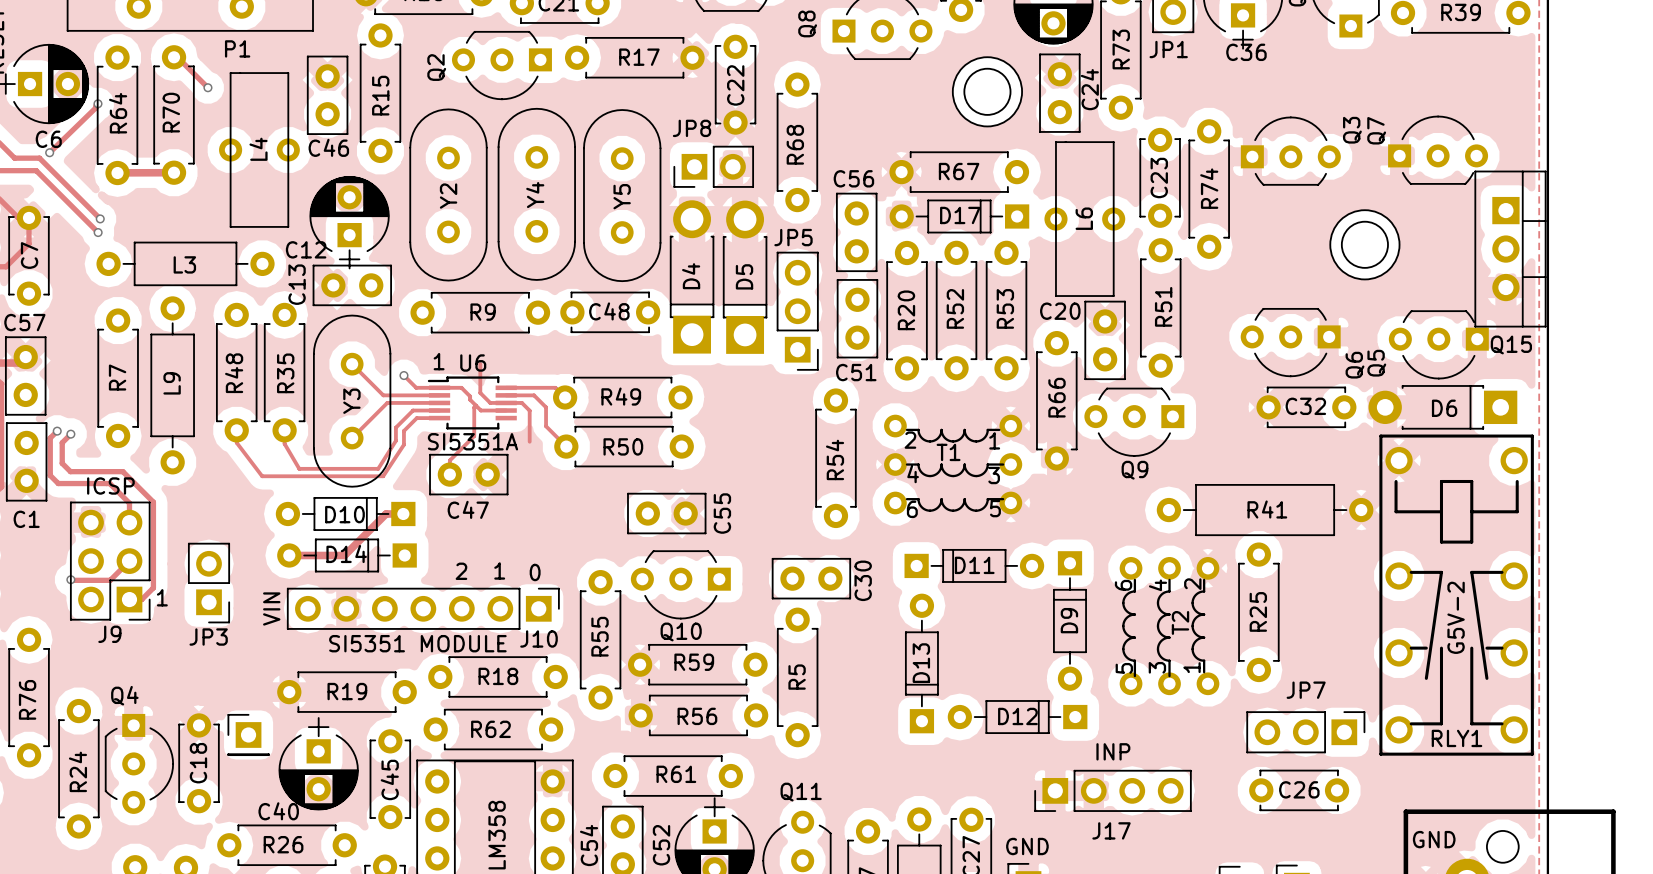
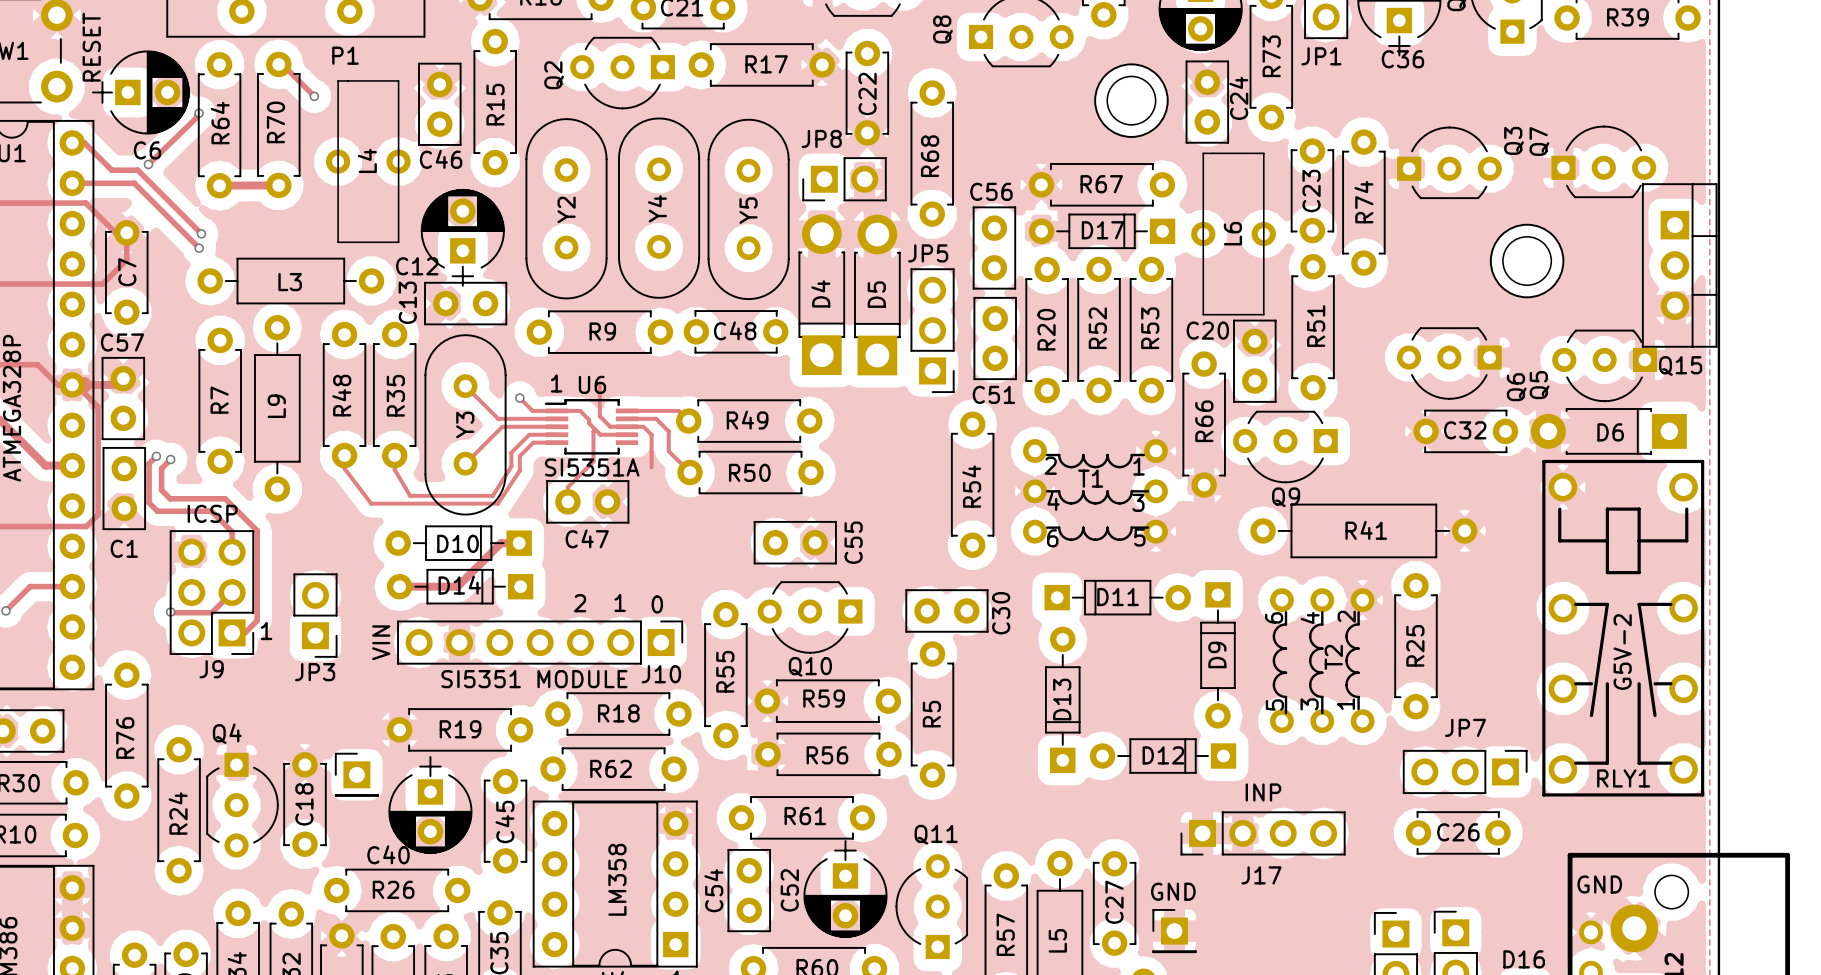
R41 position: (1265, 510) -> (1363, 530)

